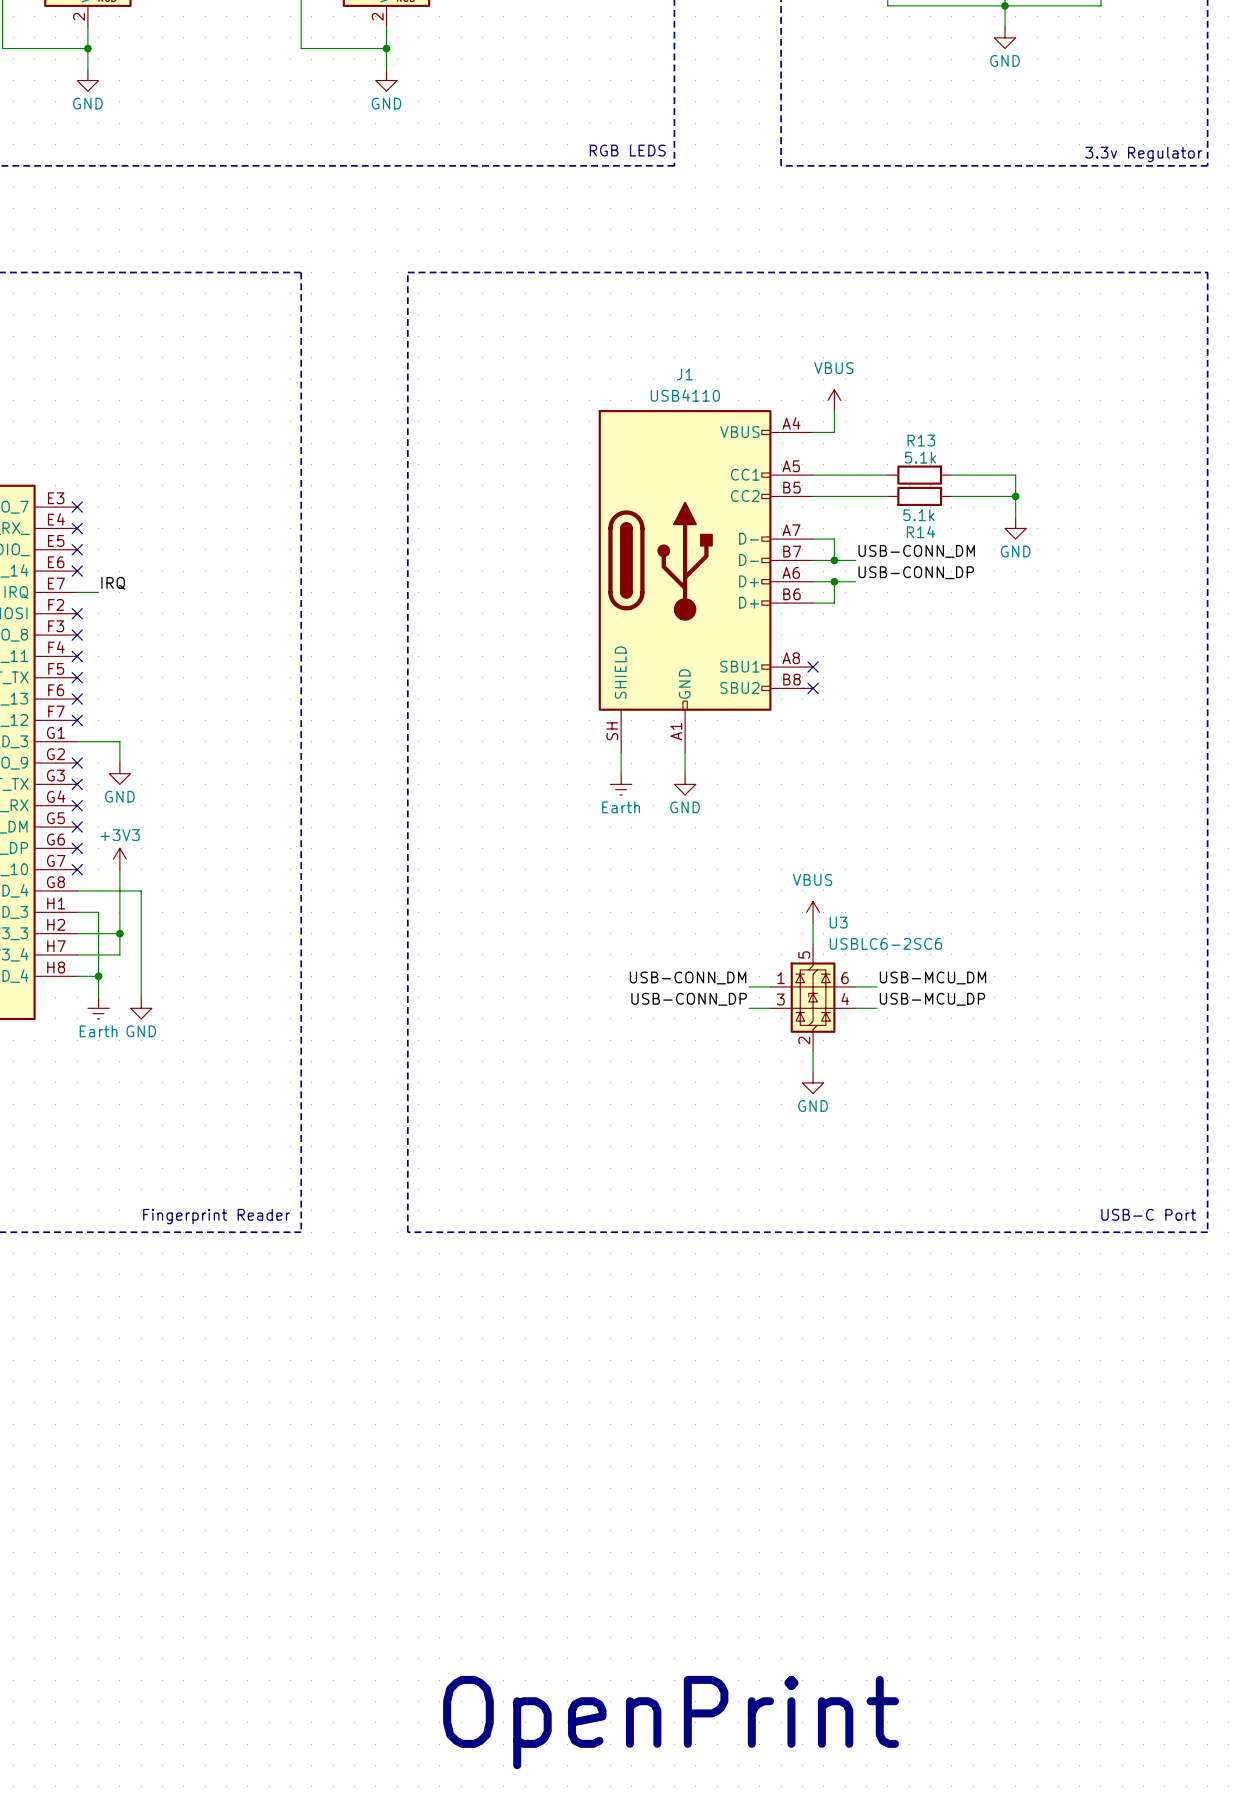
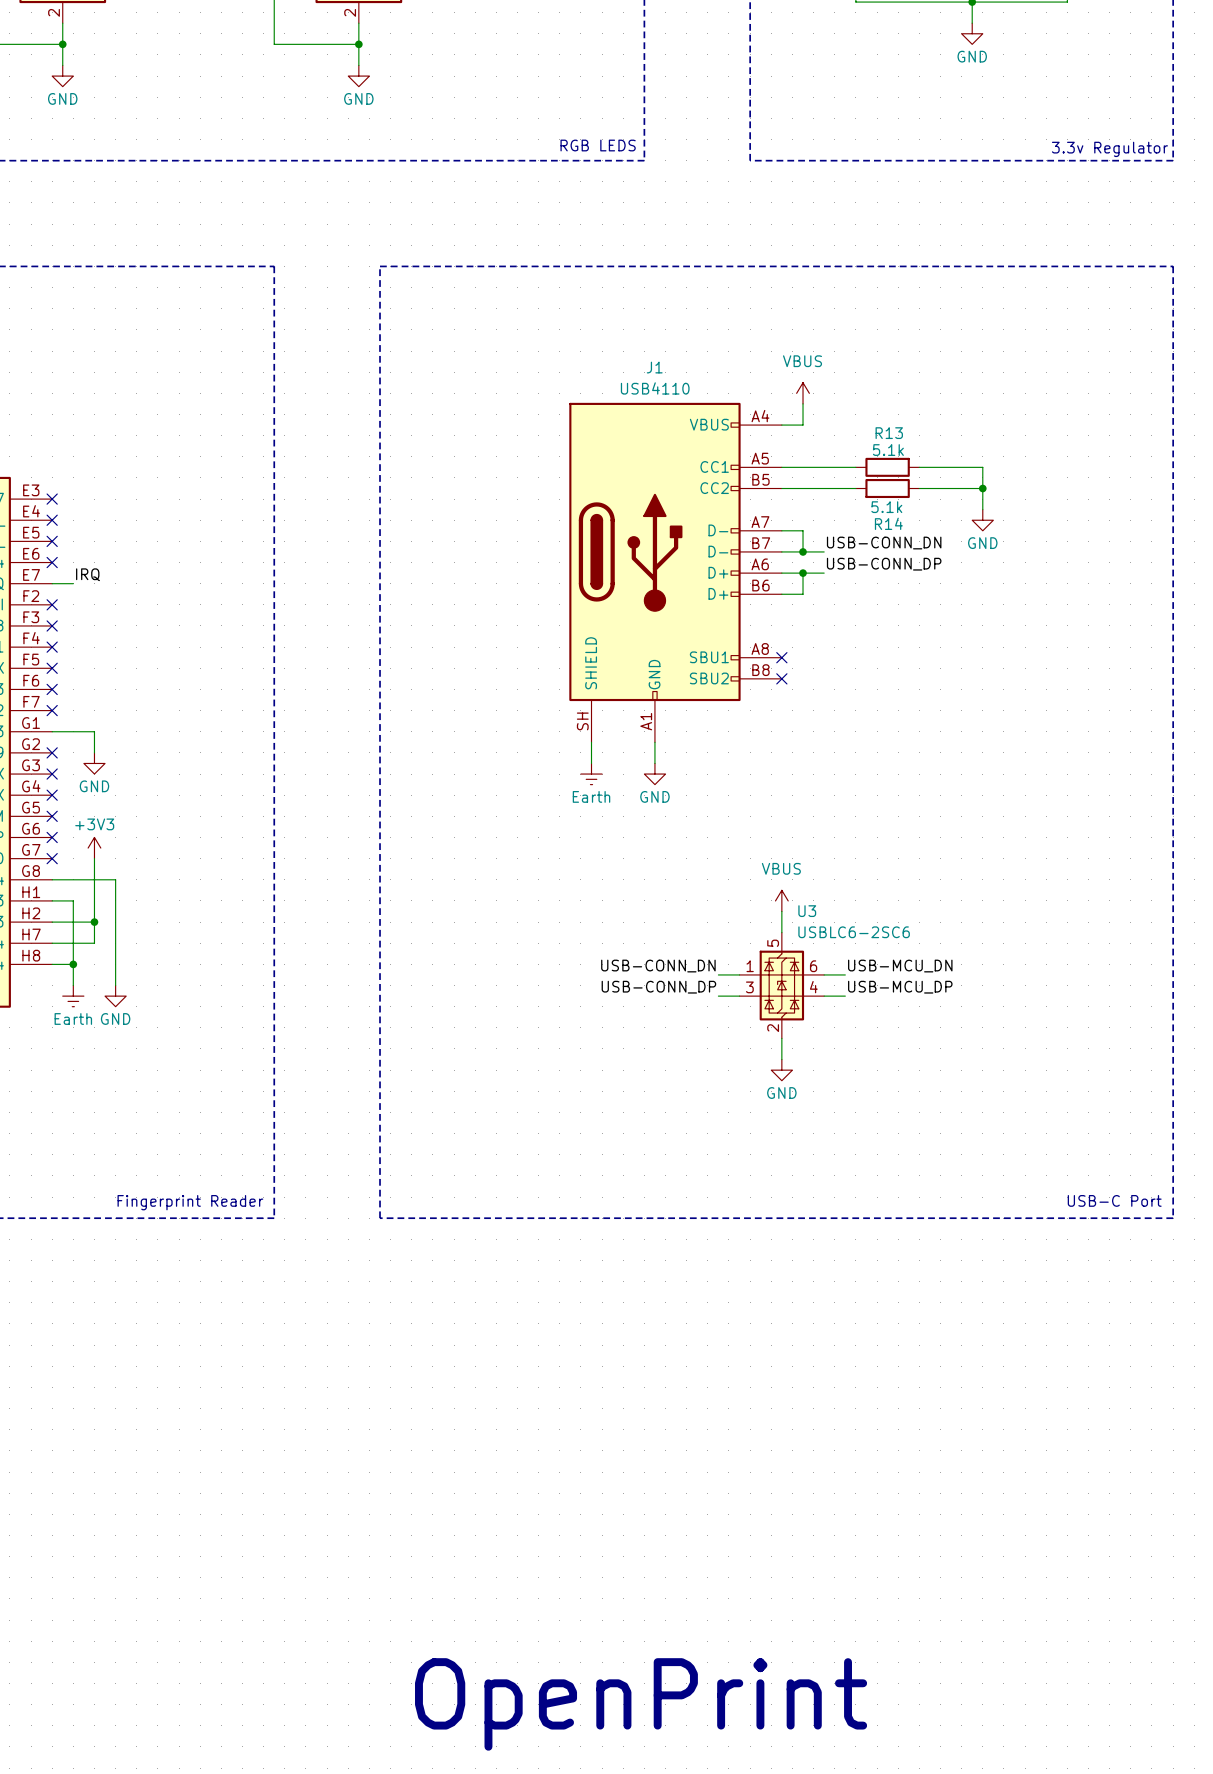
label: USB-CONN_DM (916, 551) -> USB-CONN_DN (884, 543)
label: USB-CONN_DM (688, 977) -> USB-CONN_DN (658, 966)
label: USB-MCU_DM (932, 977) -> USB-MCU_DN (900, 966)

